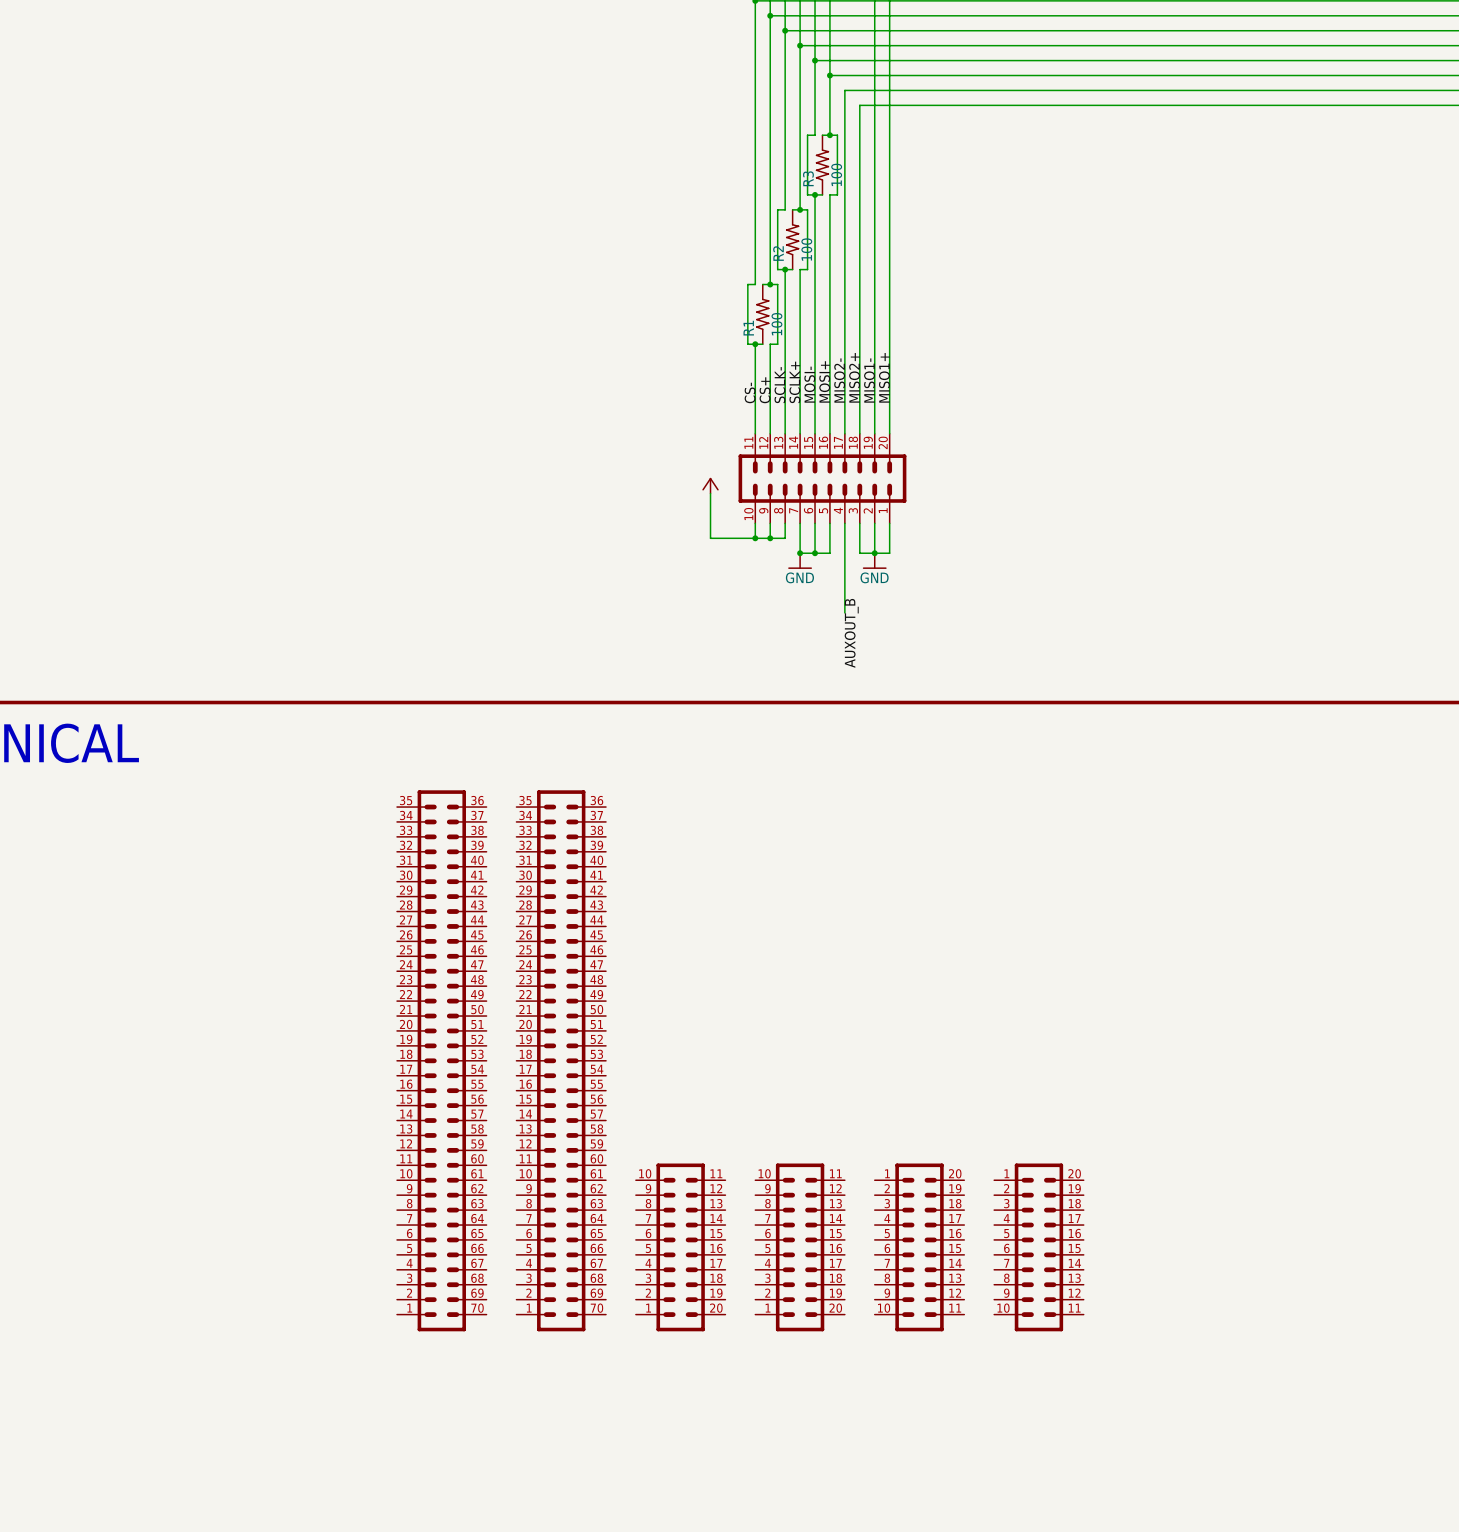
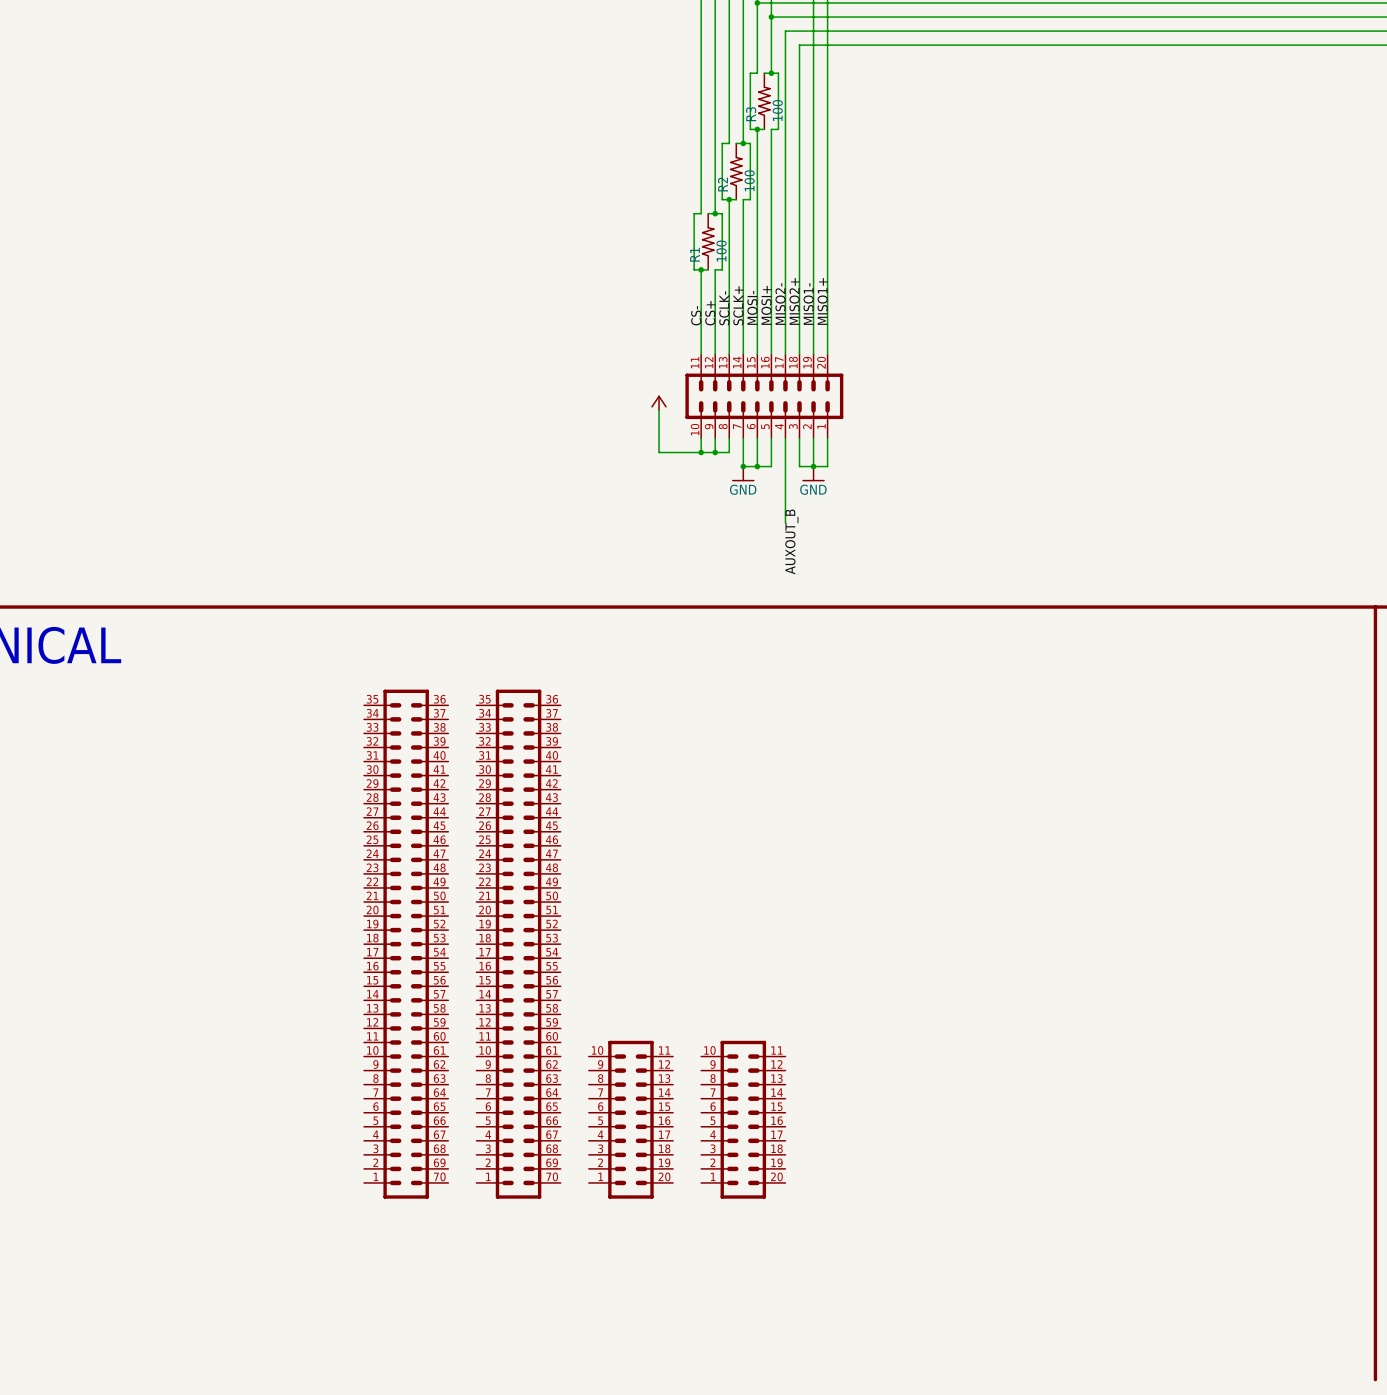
part: (919, 1247) -> none
part: (1038, 1247) -> none

